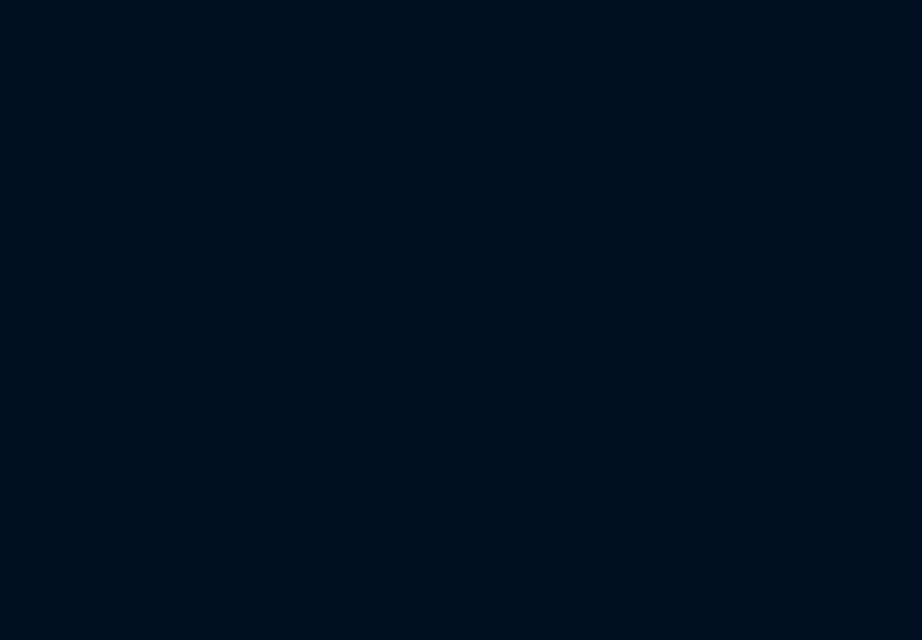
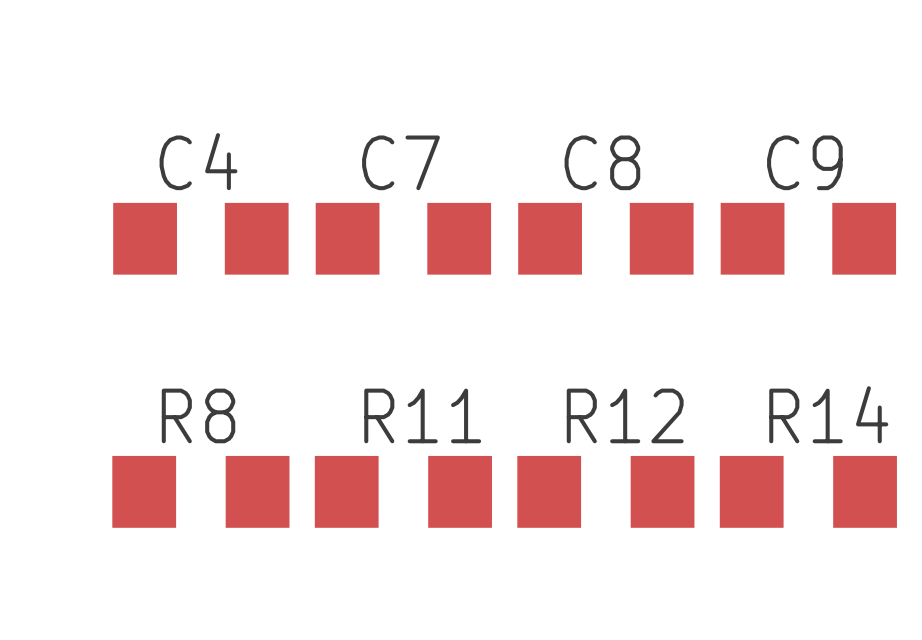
C4: none -> (200, 238)
C7: none -> (403, 238)
C8: none -> (605, 238)
C9: none -> (808, 238)
R8: none -> (200, 491)
R11: none -> (403, 491)
R12: none -> (605, 491)
R14: none -> (808, 491)

